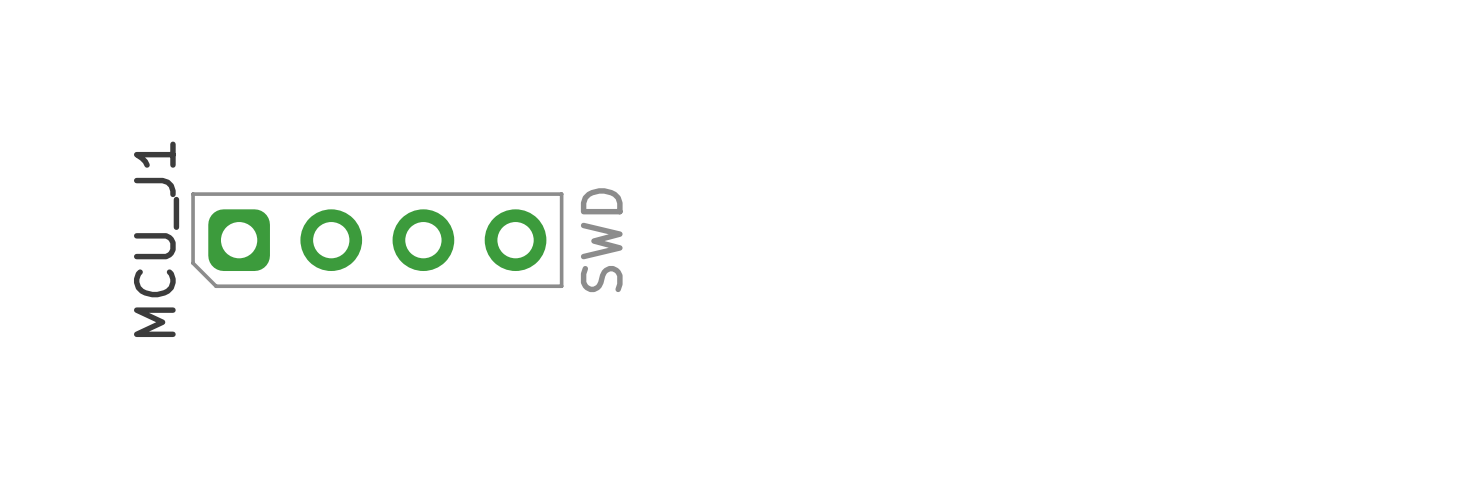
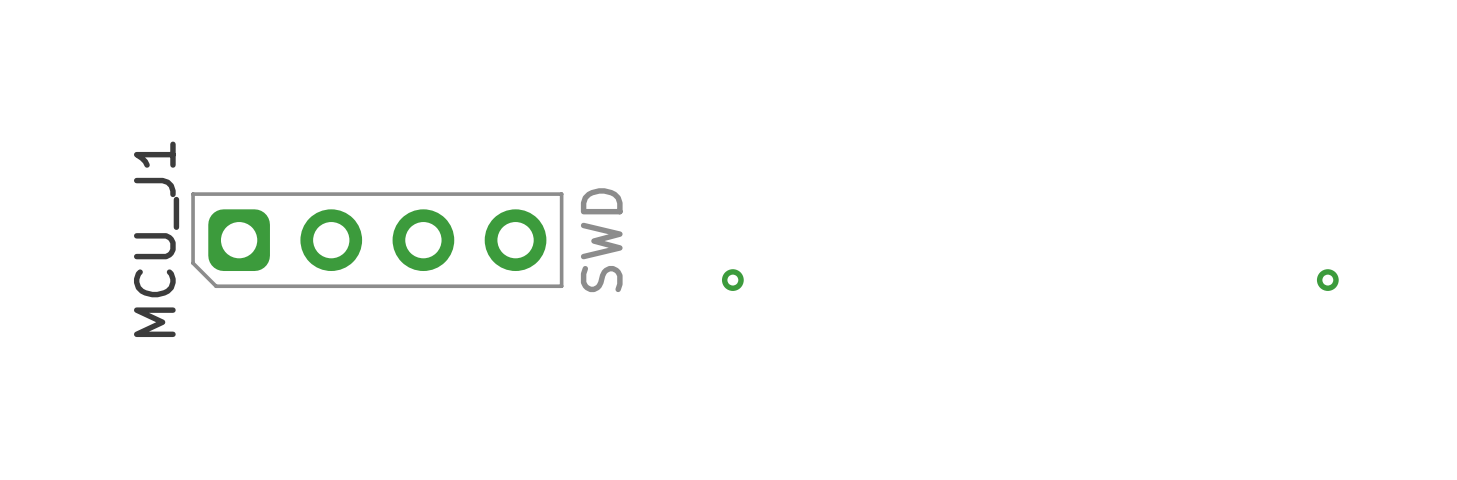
via: none -> (732, 280)
via: none -> (1327, 280)

